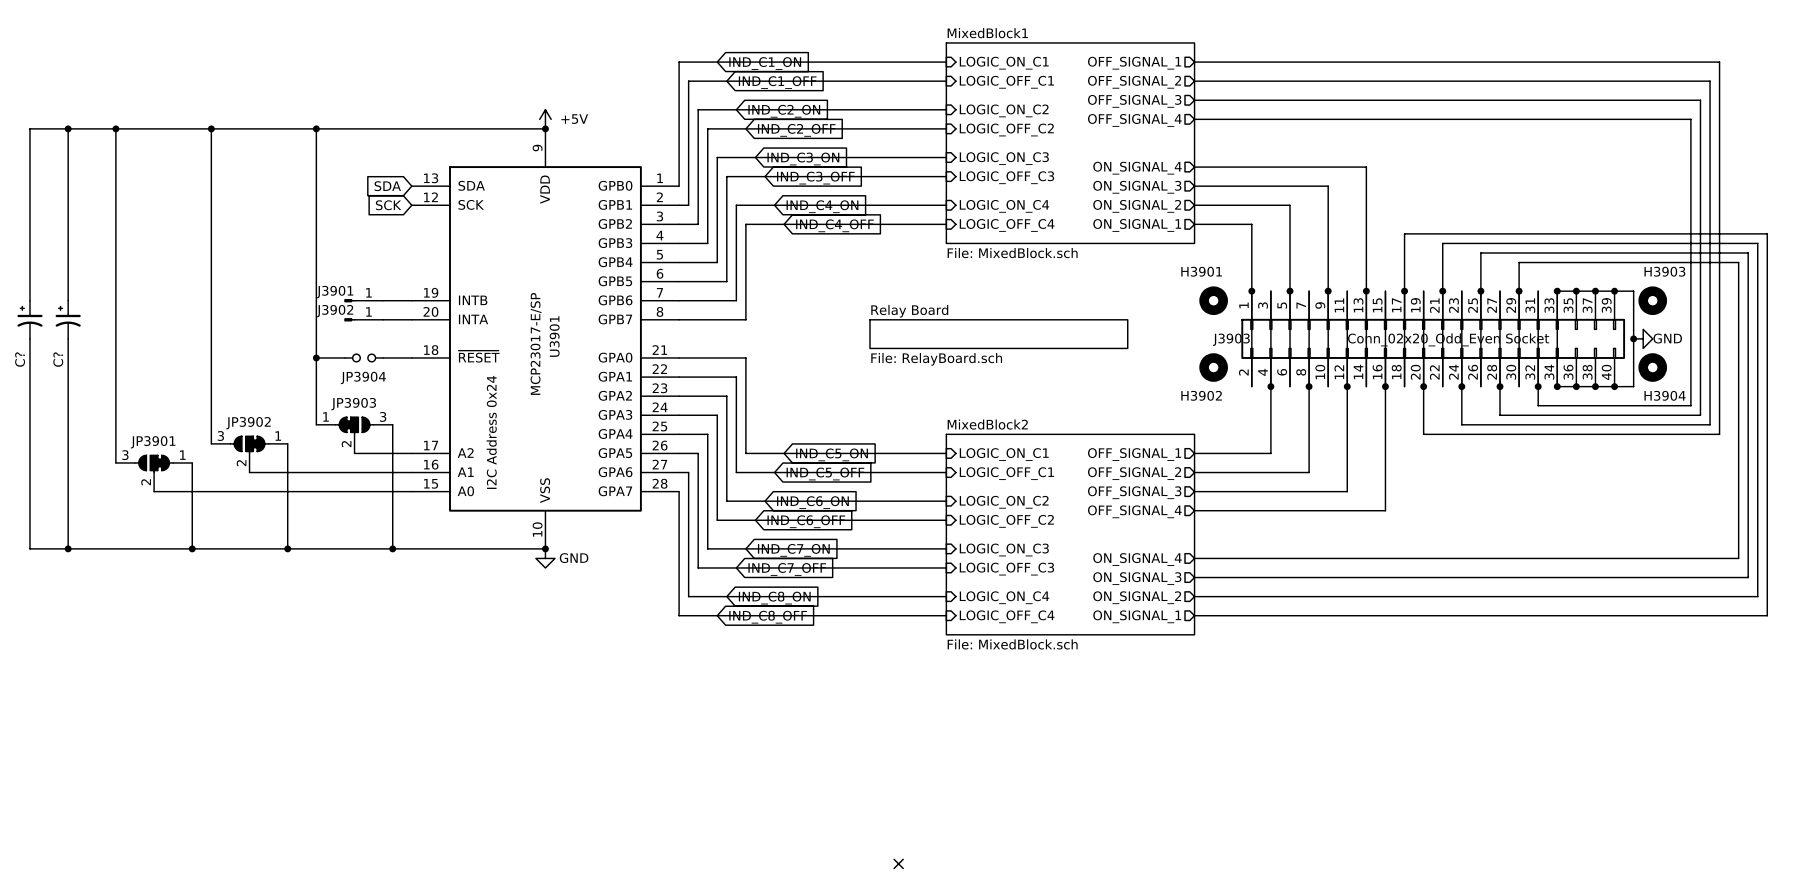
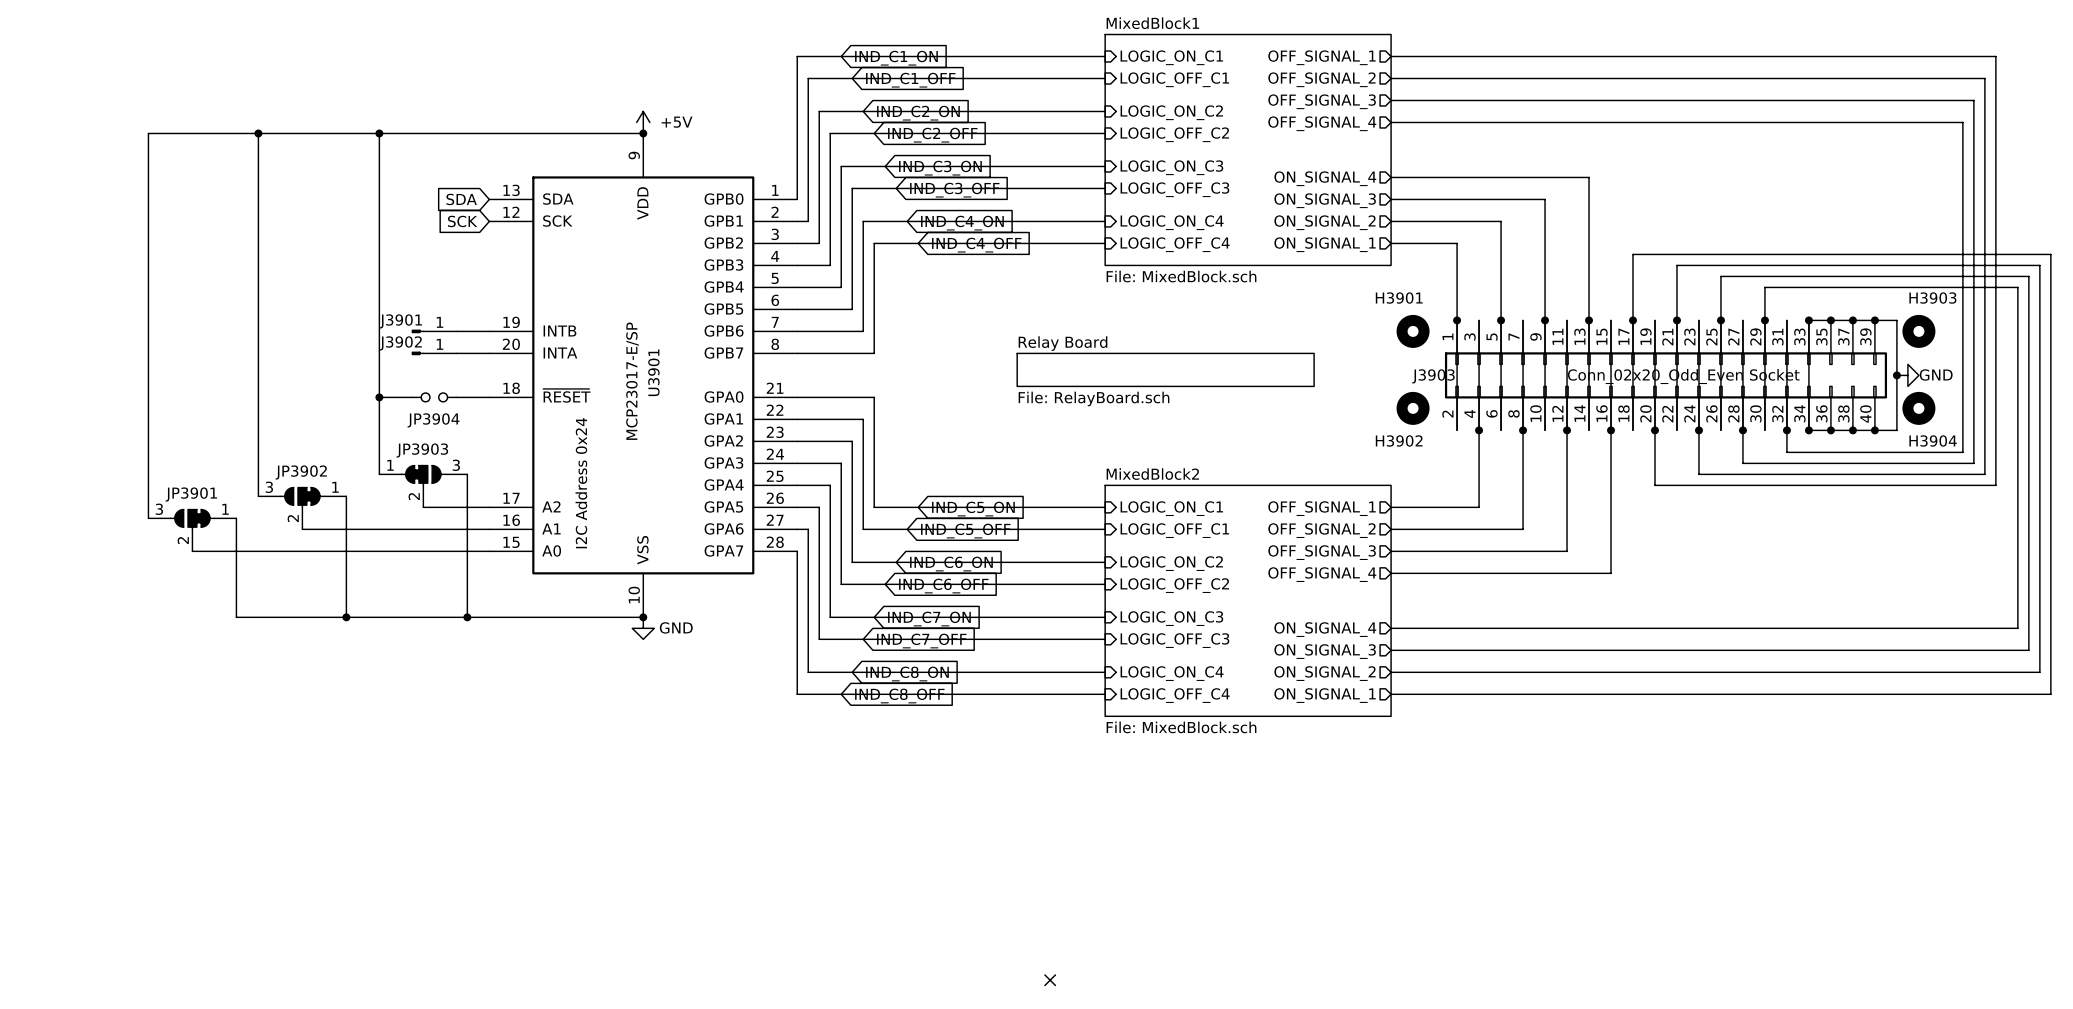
wire: (68, 128) (68, 300) -> none
junction: (68, 128) -> none
wire: (115, 128) (29, 128) (29, 300) -> none
junction: (115, 128) -> none
C?: (29, 319) -> none
C?: (68, 319) -> none
wire: (29, 338) (29, 548) (192, 548) -> none
wire: (68, 338) (68, 548) -> none
junction: (68, 548) -> none
junction: (192, 548) -> none

